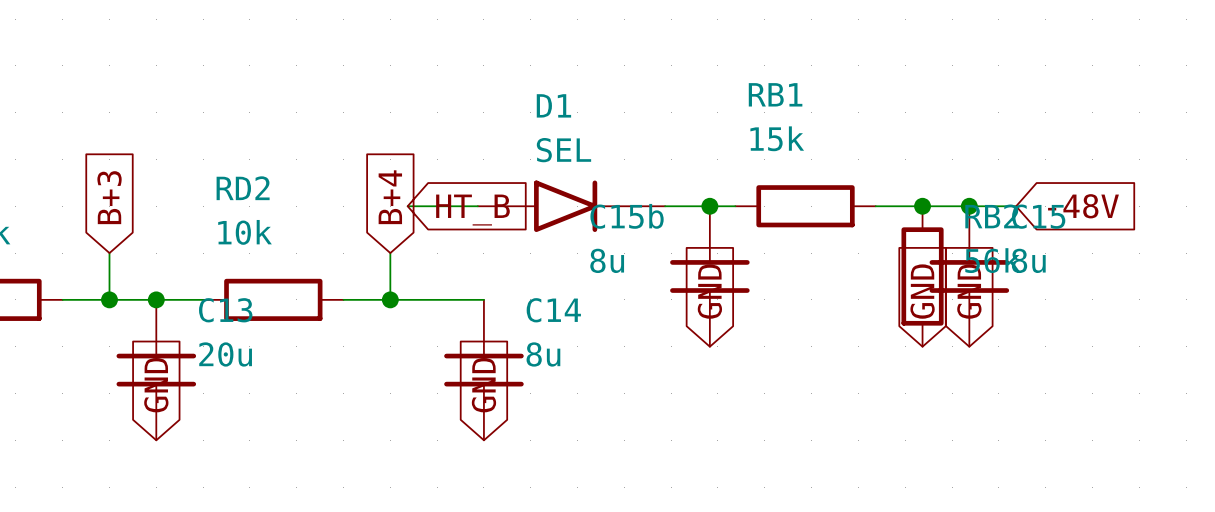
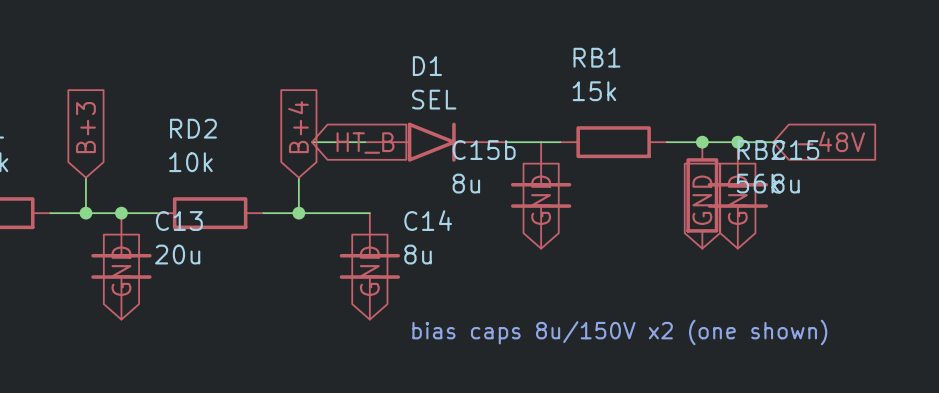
junction: (709, 206) -> none
text: none -> bias caps 8u/150V x2 (one shown) (619, 332)

